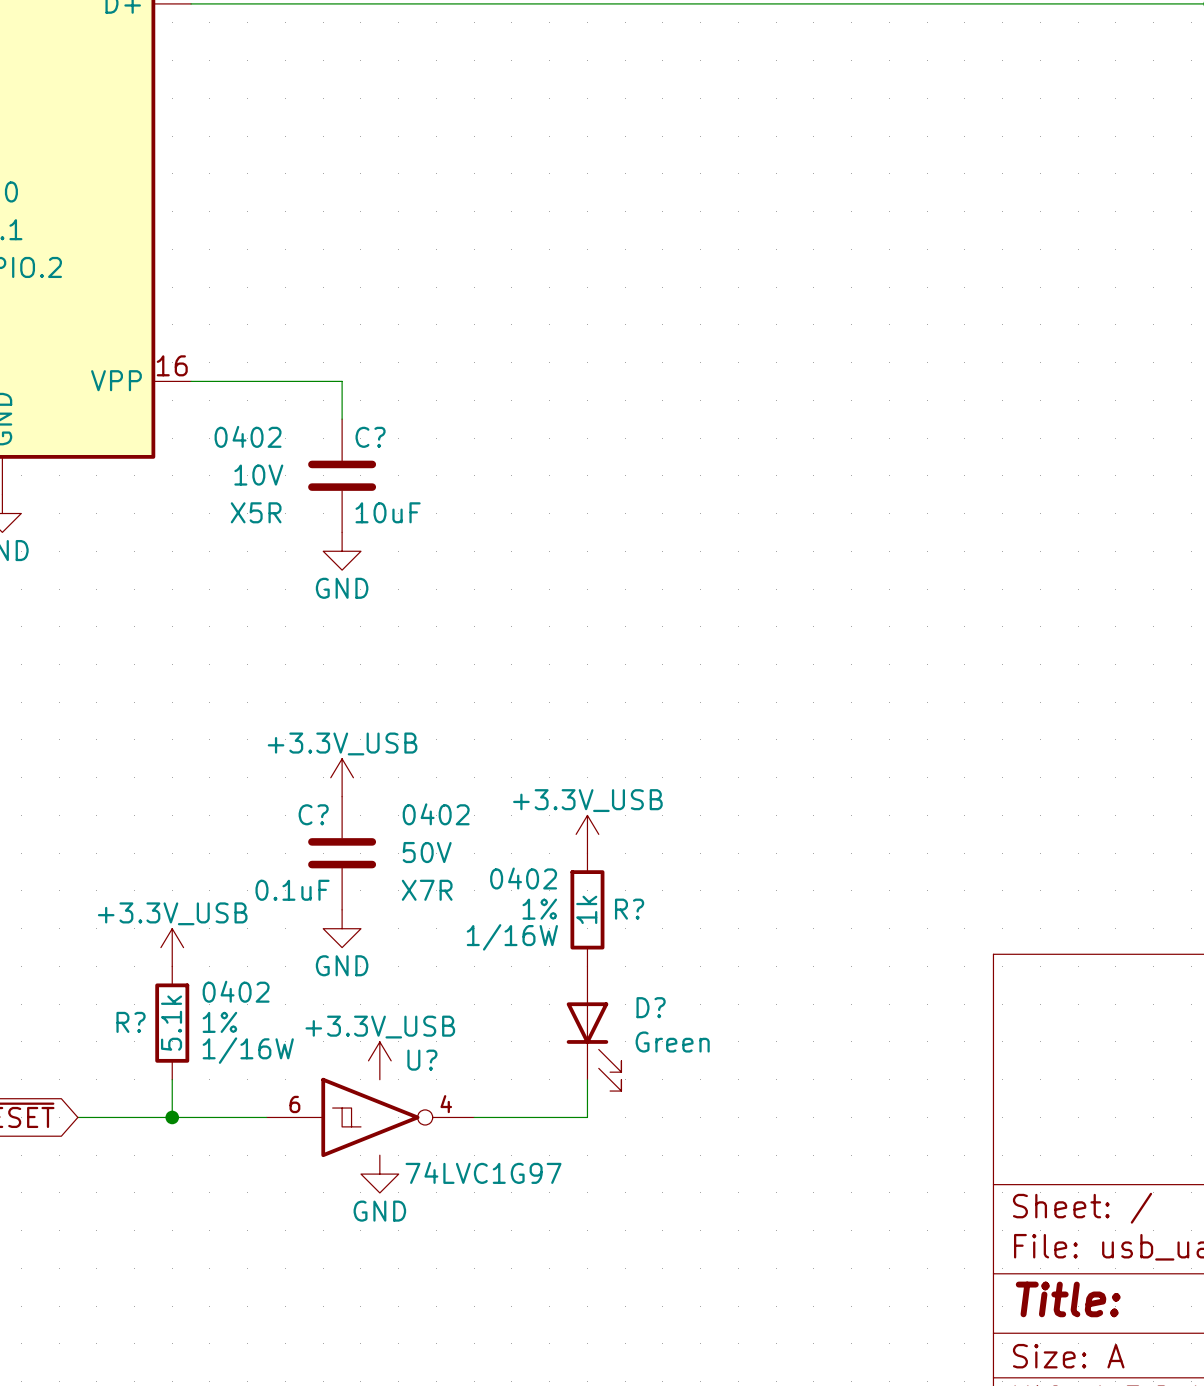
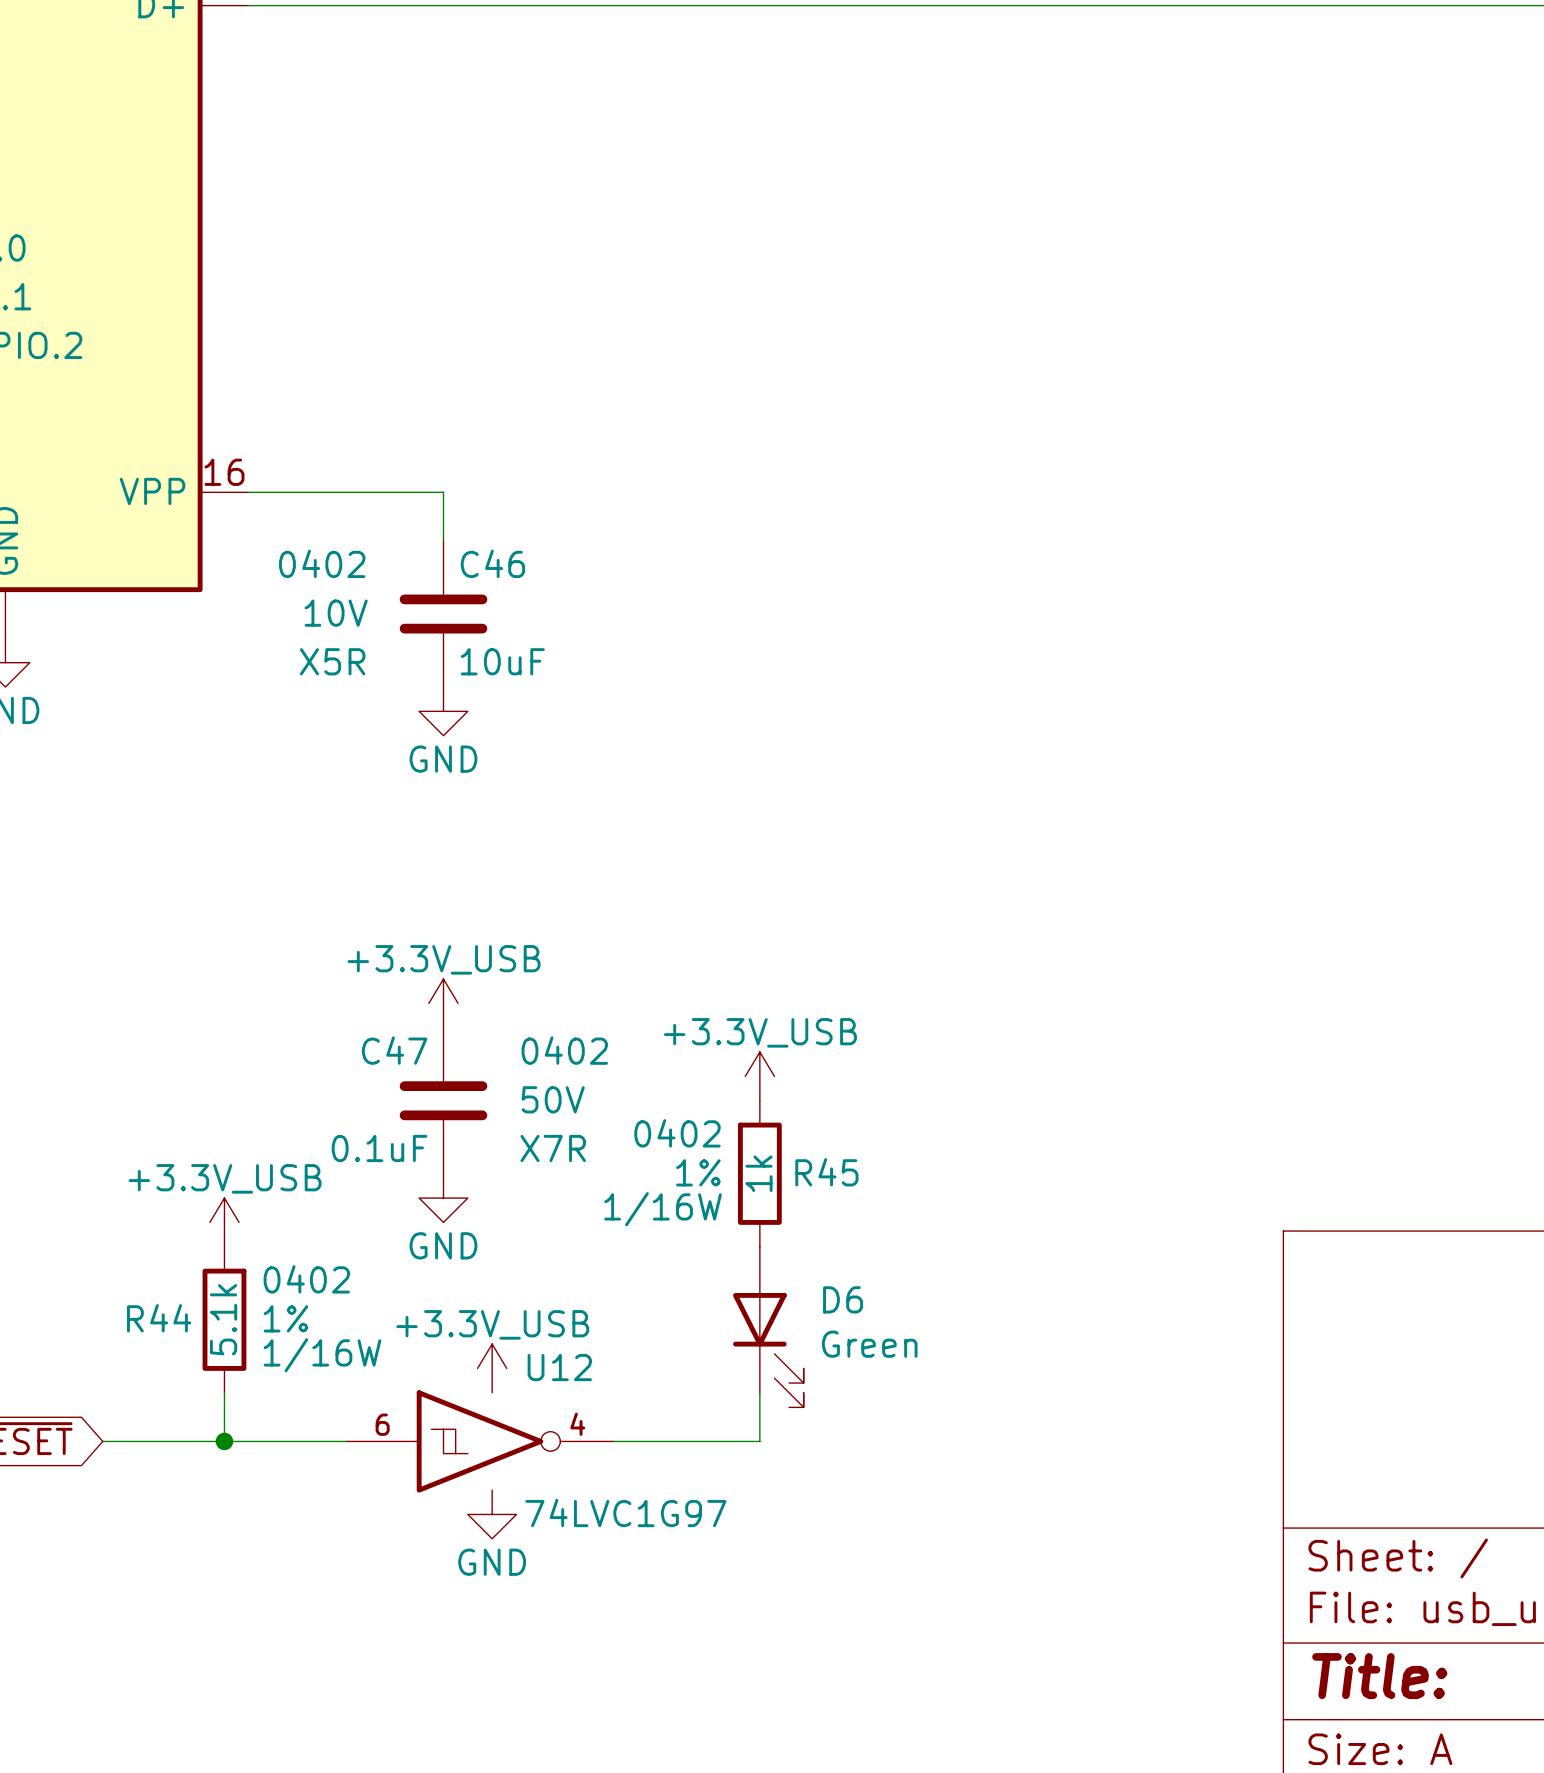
C? name: C? (370, 437) -> C46 (492, 563)
C? name: C? (313, 814) -> C47 (394, 1050)
R? name: R? (629, 909) -> R45 (826, 1172)
D? name: D? (651, 1007) -> D6 (843, 1299)
R? name: R? (131, 1022) -> R44 (159, 1318)
U? name: U? (422, 1060) -> U12 (559, 1367)

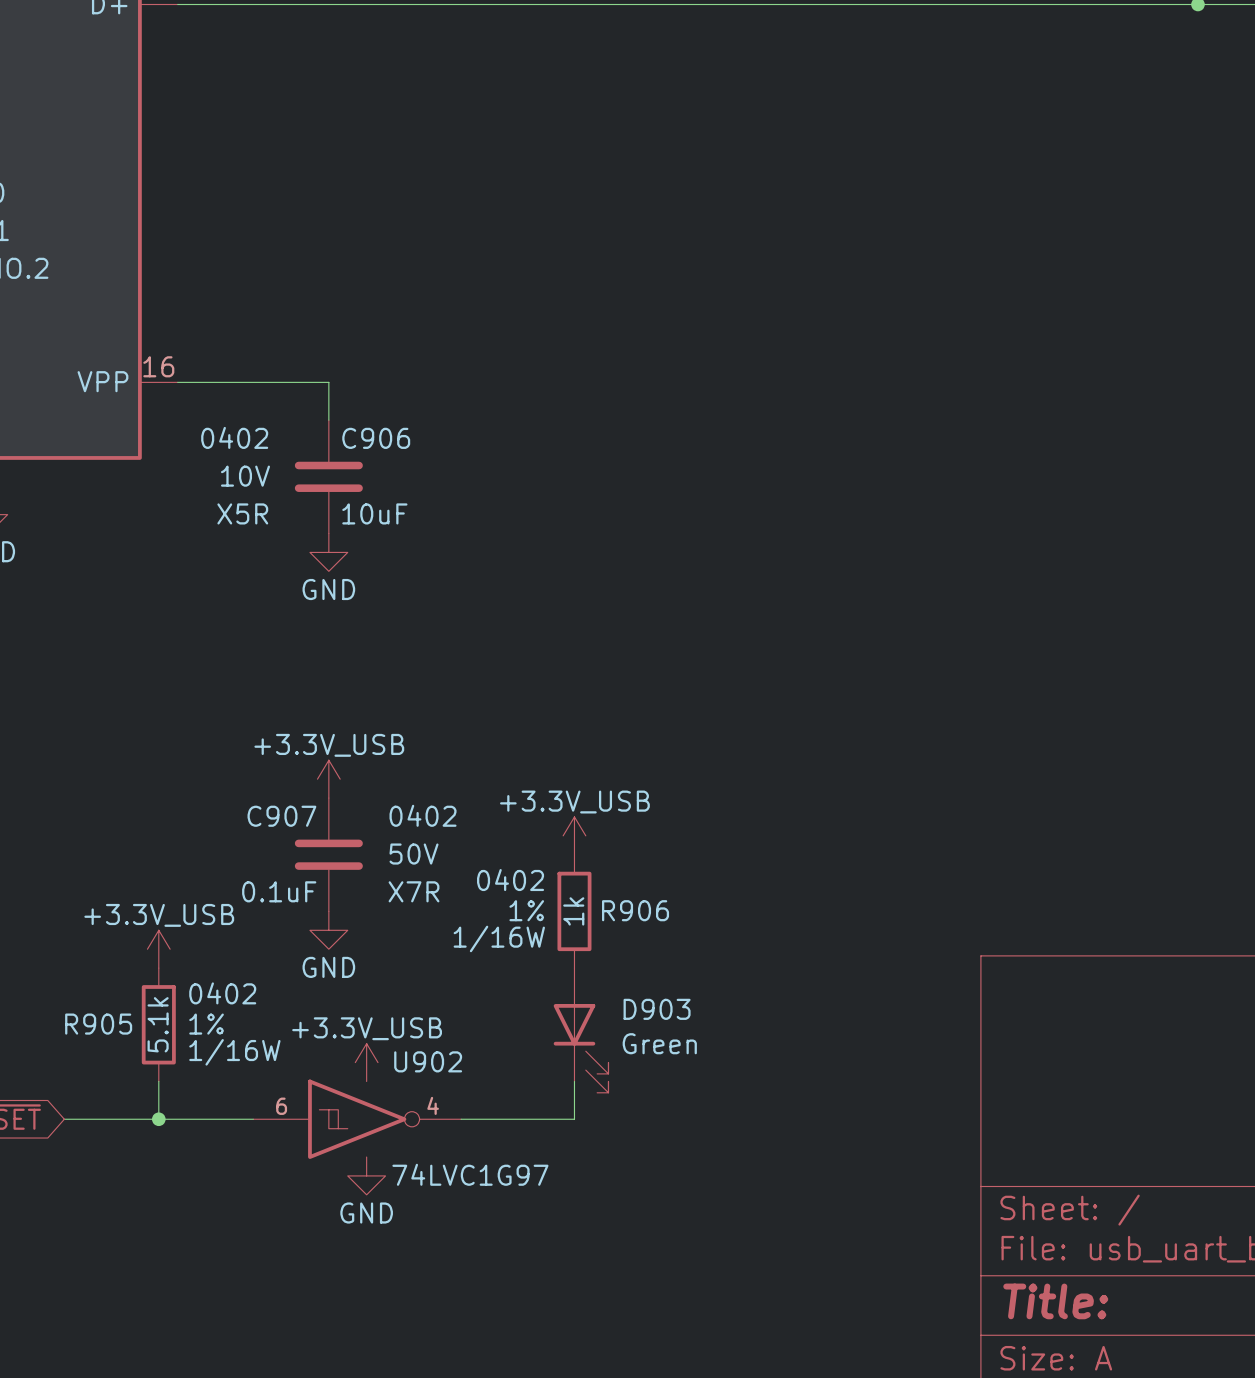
C46 name: C46 (492, 563) -> C906 (376, 438)
C47 name: C47 (394, 1050) -> C907 (281, 816)
R45 name: R45 (826, 1172) -> R906 (635, 910)
D6 name: D6 (843, 1299) -> D903 (657, 1009)
R44 name: R44 (159, 1318) -> R905 (98, 1024)
U12 name: U12 (559, 1367) -> U902 (428, 1061)

